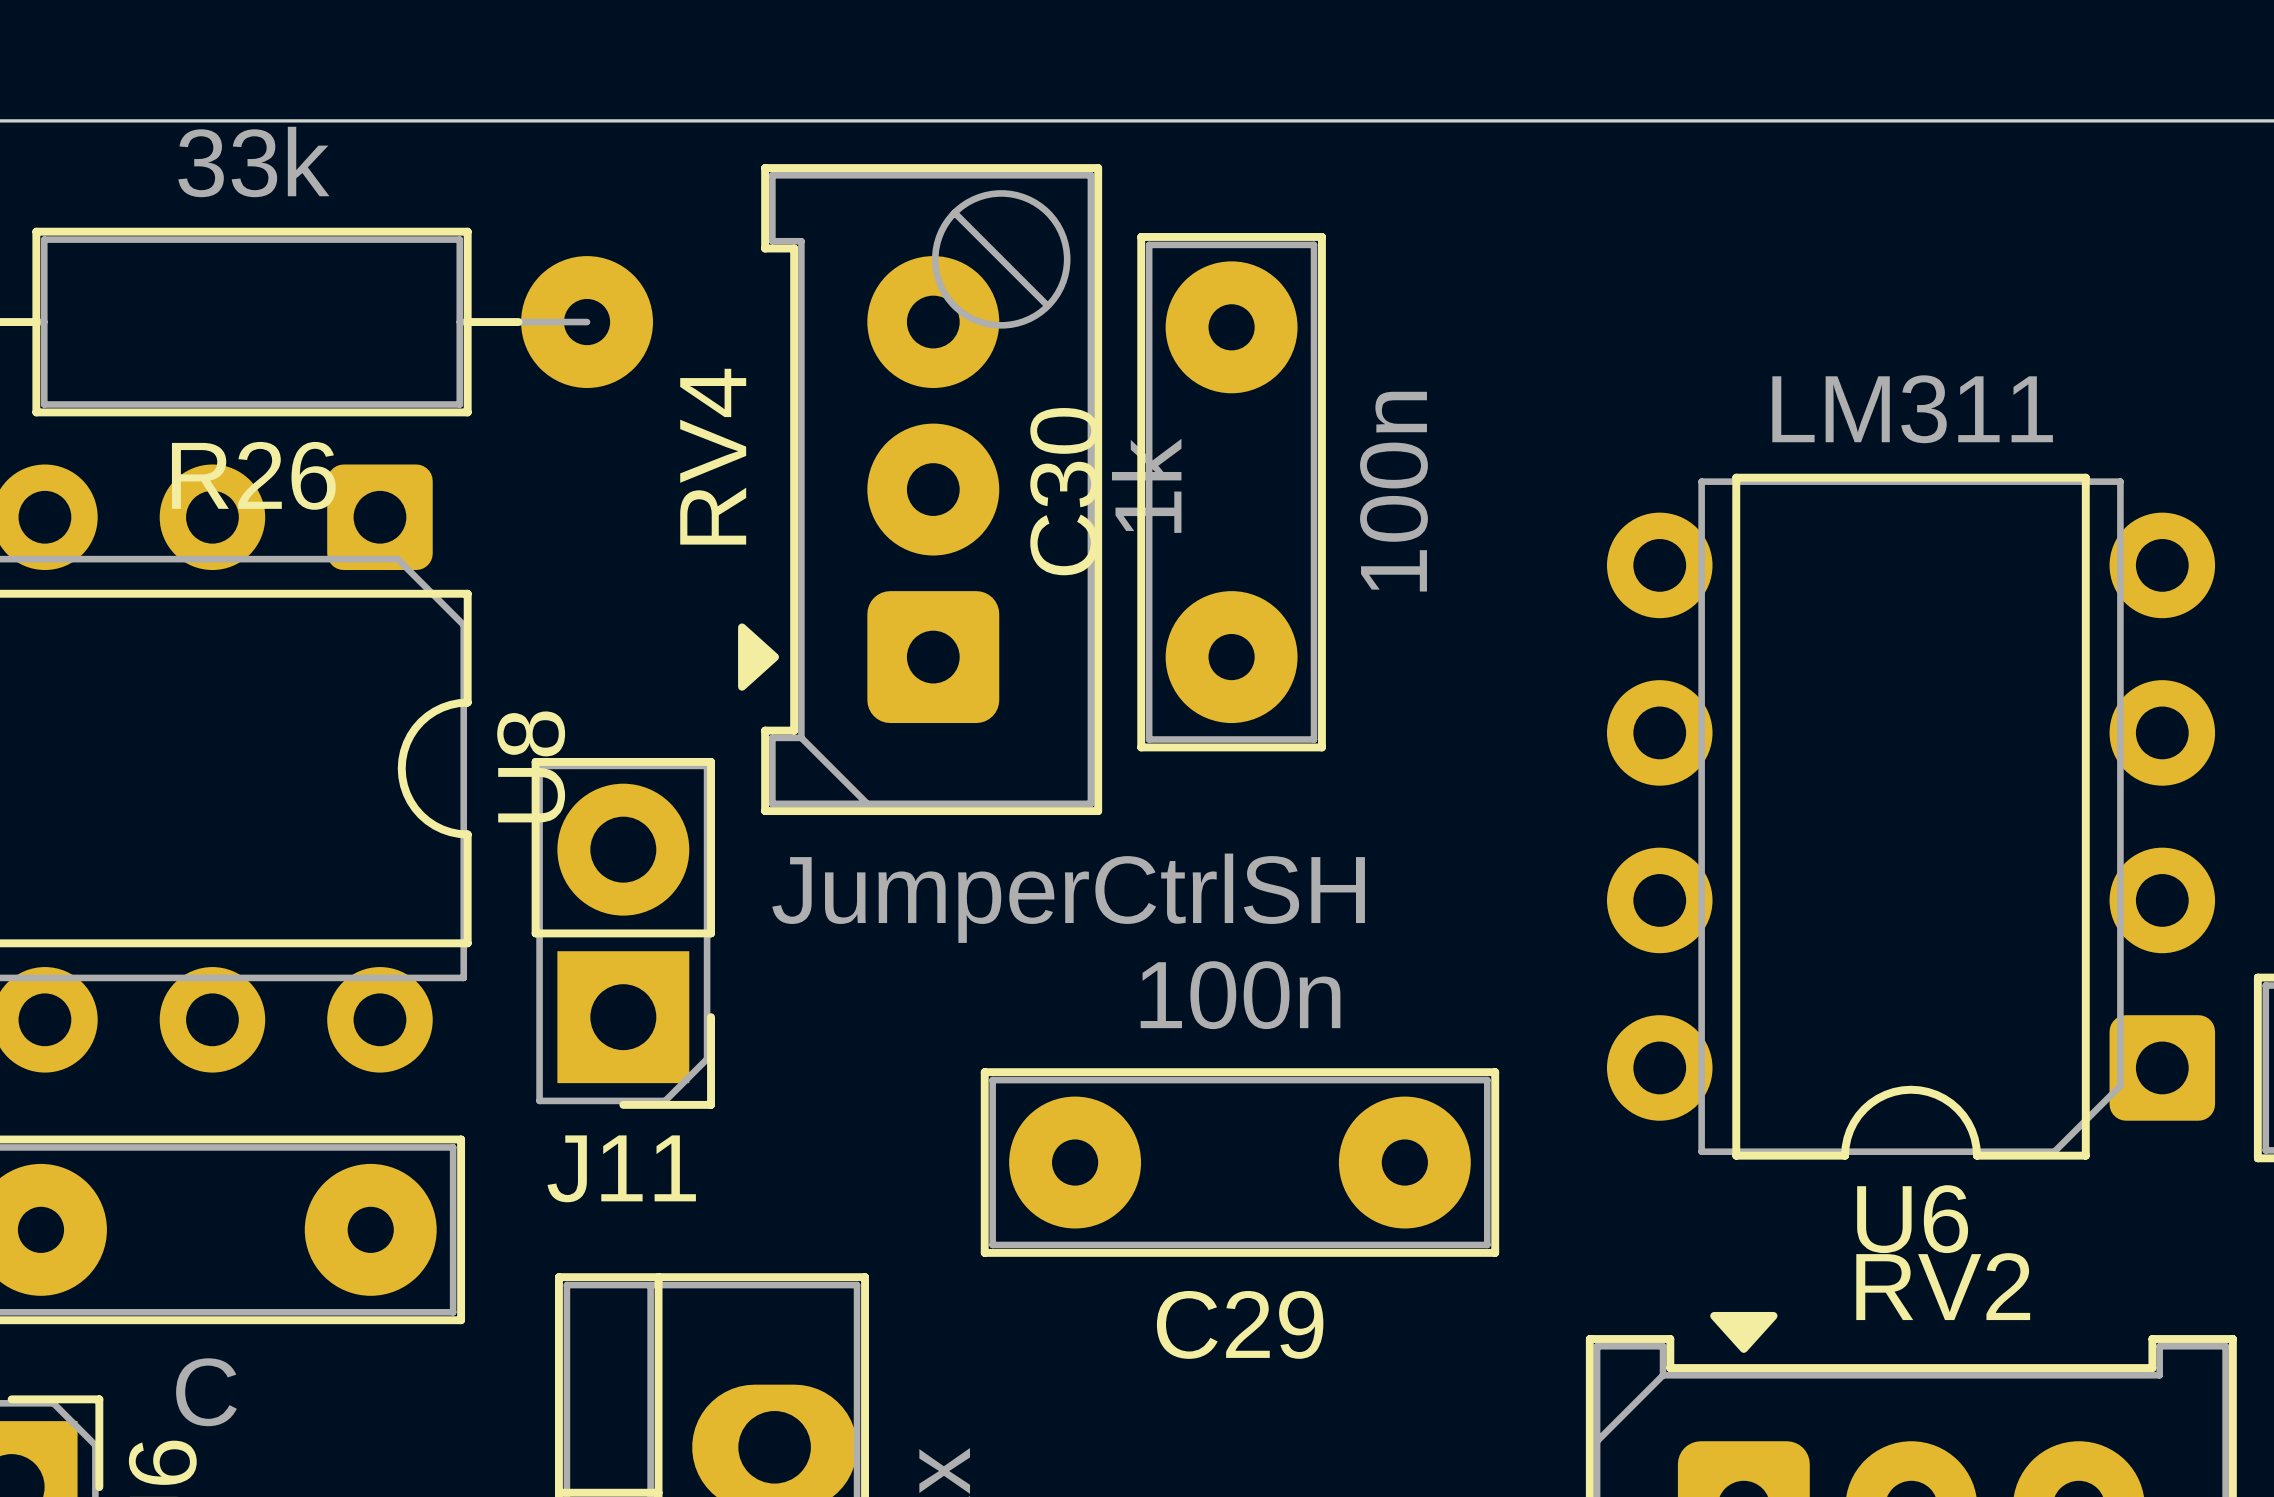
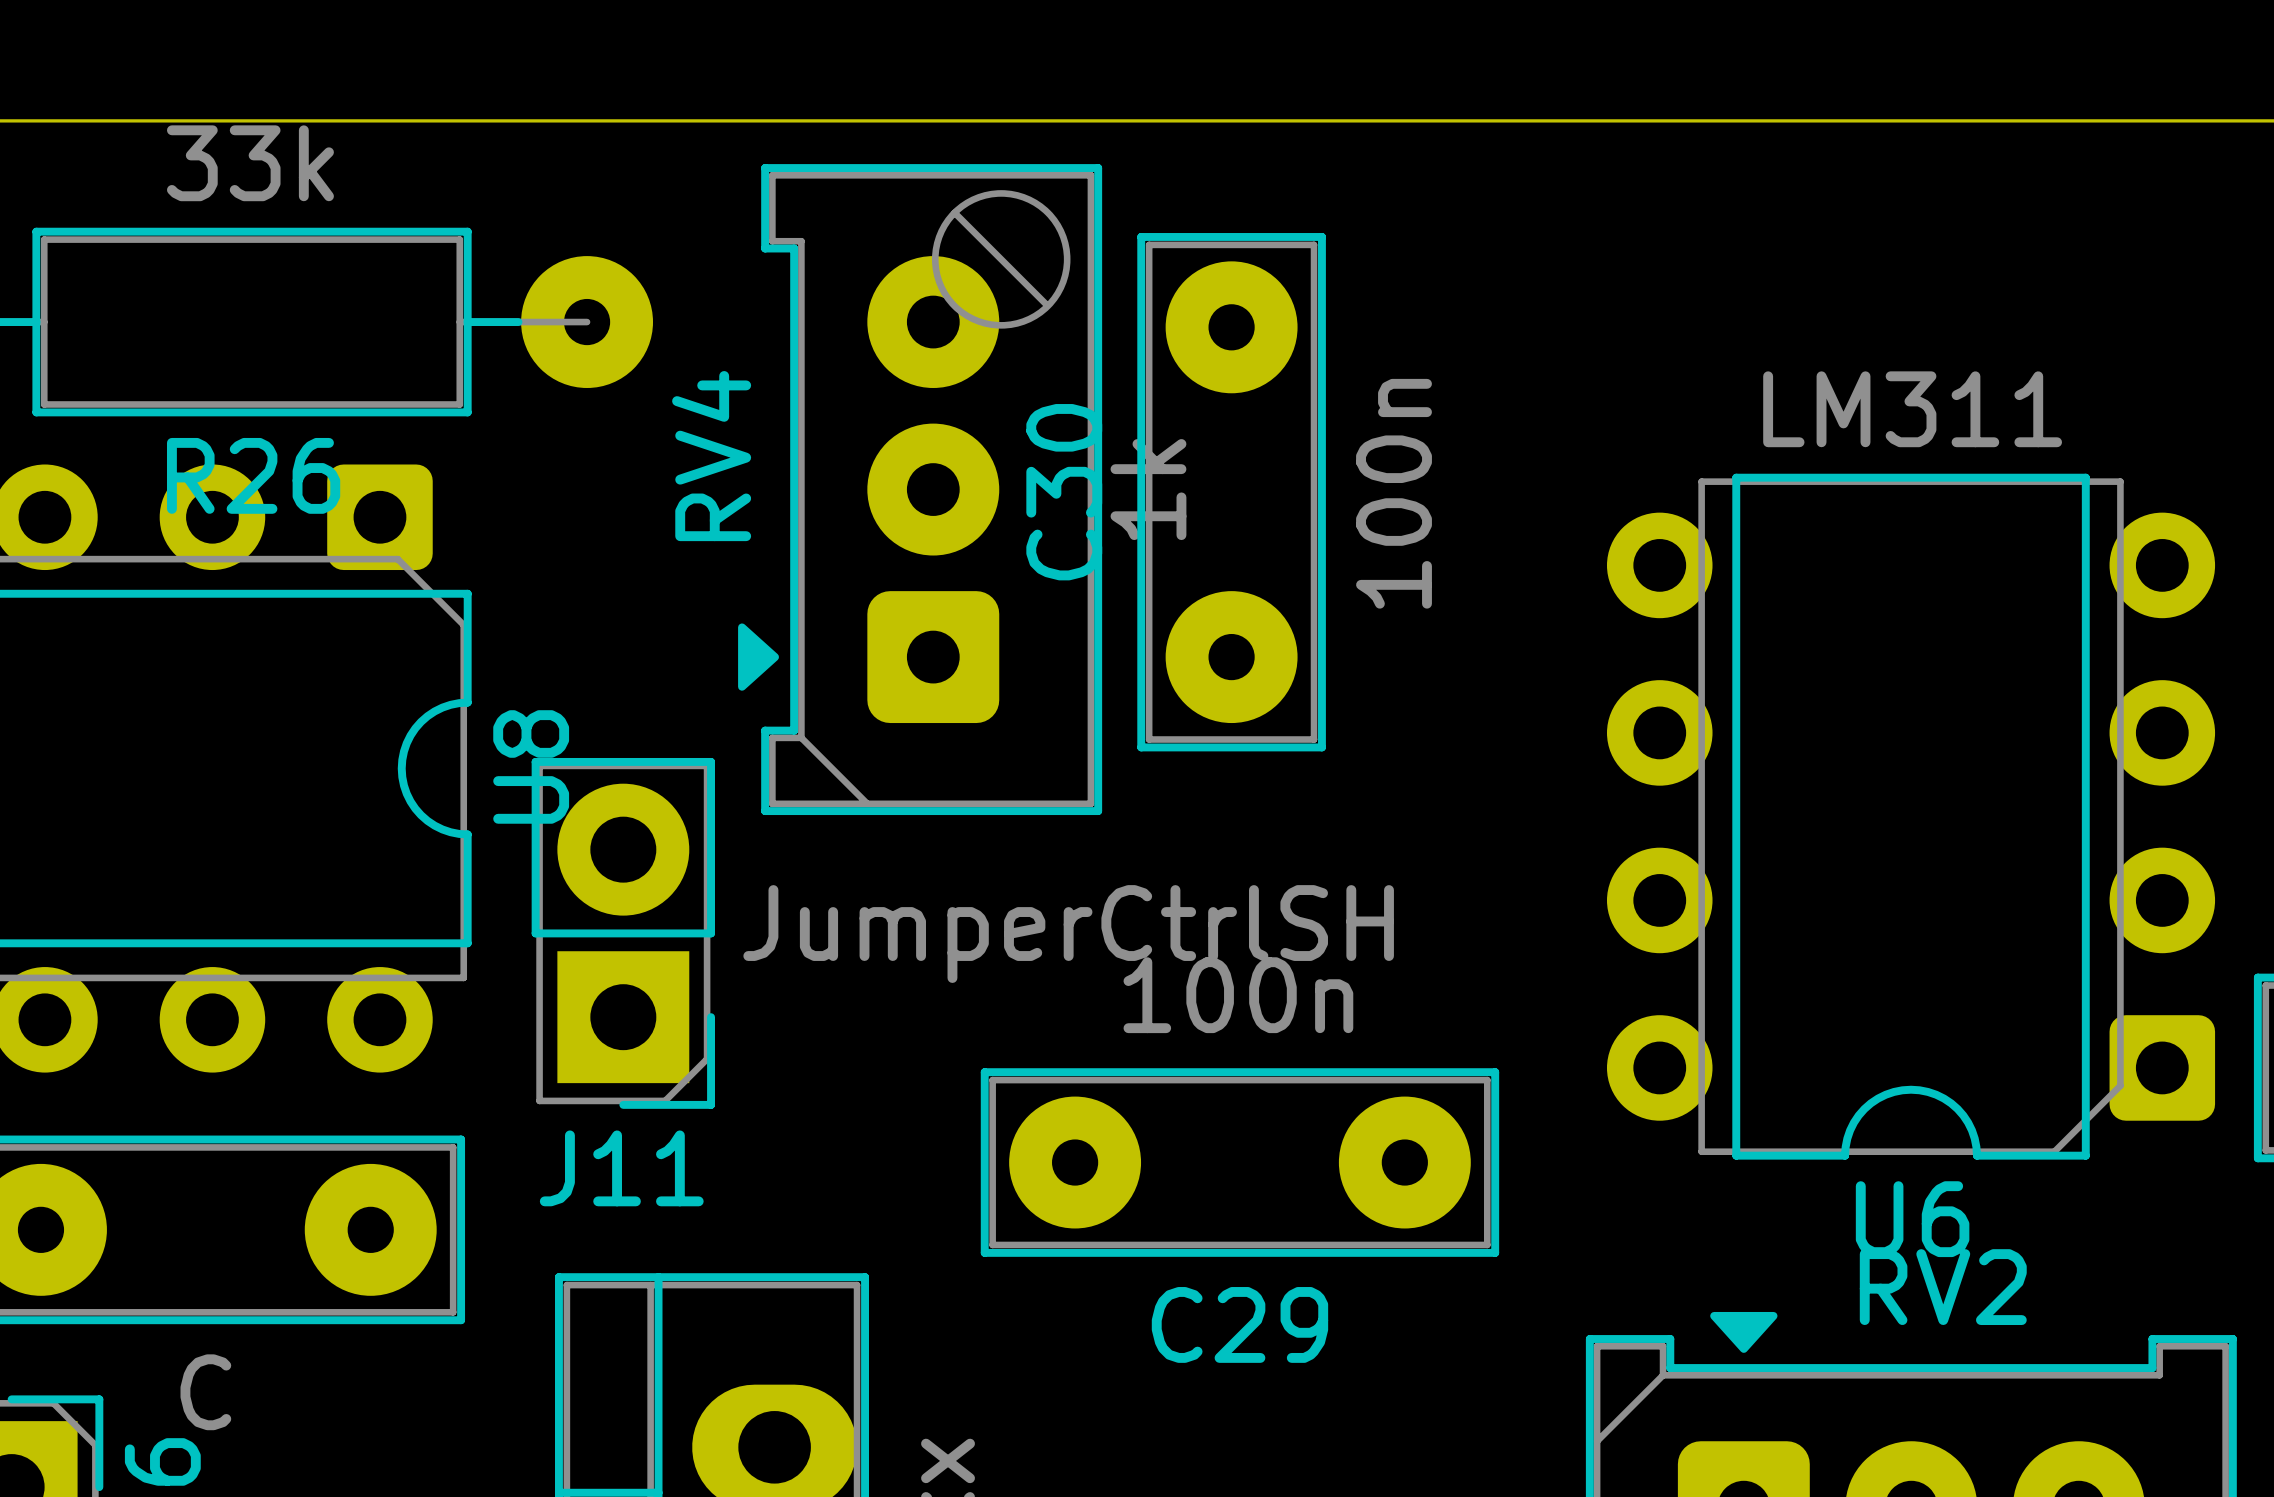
J11 value position: JumperCtrlSH (1068, 898) -> JumperCtrlSH (1068, 934)

